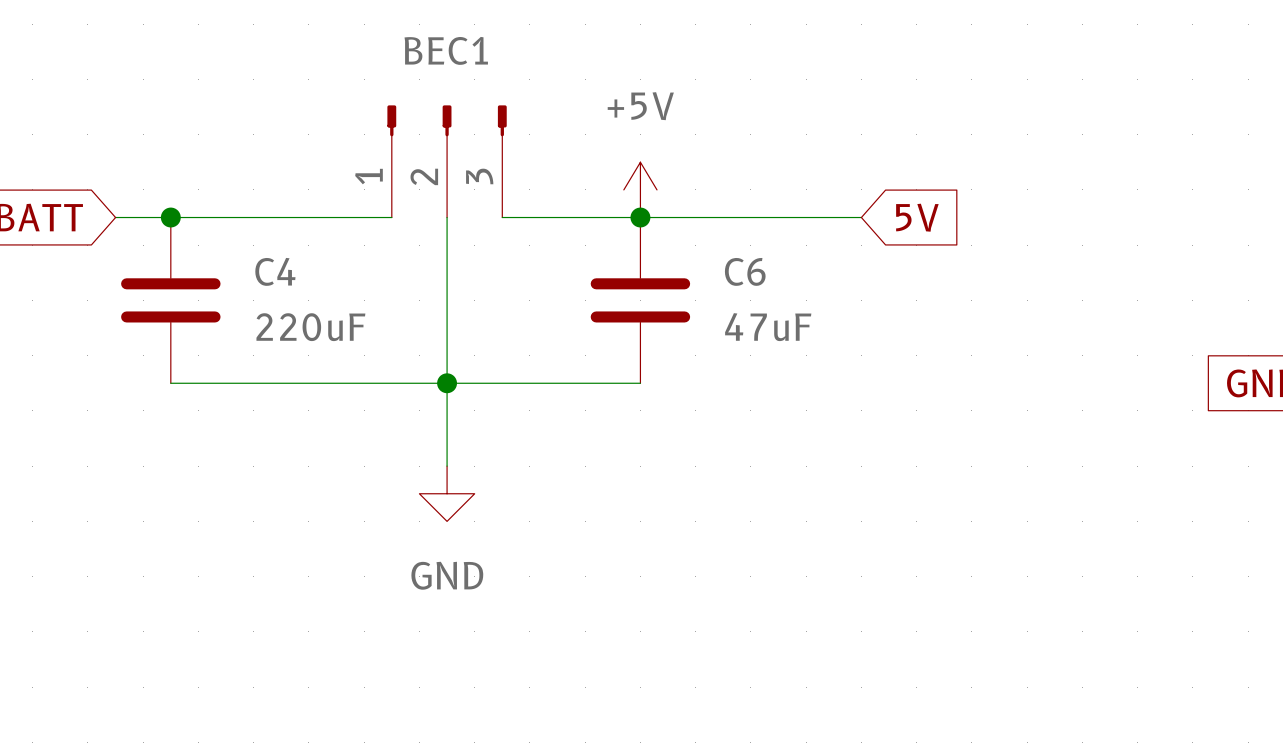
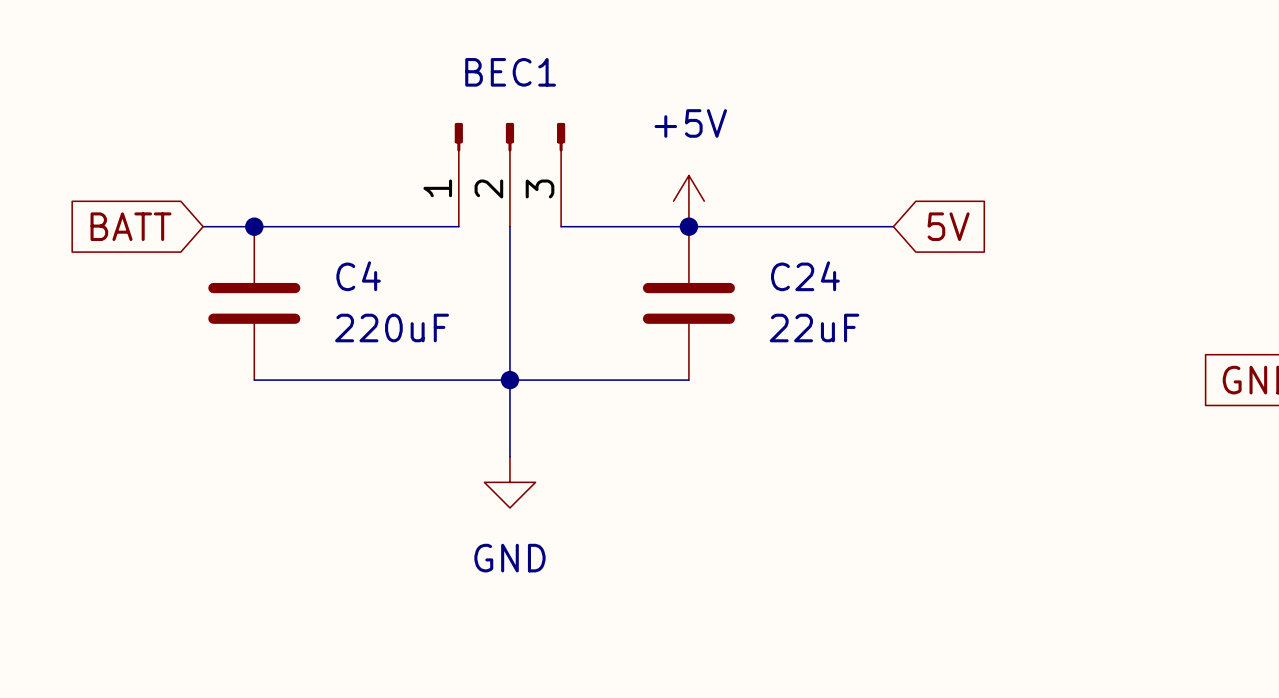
C6 name: C6 (745, 271) -> C24 (805, 276)
C6 value: 47uF (768, 327) -> 22uF (814, 328)

